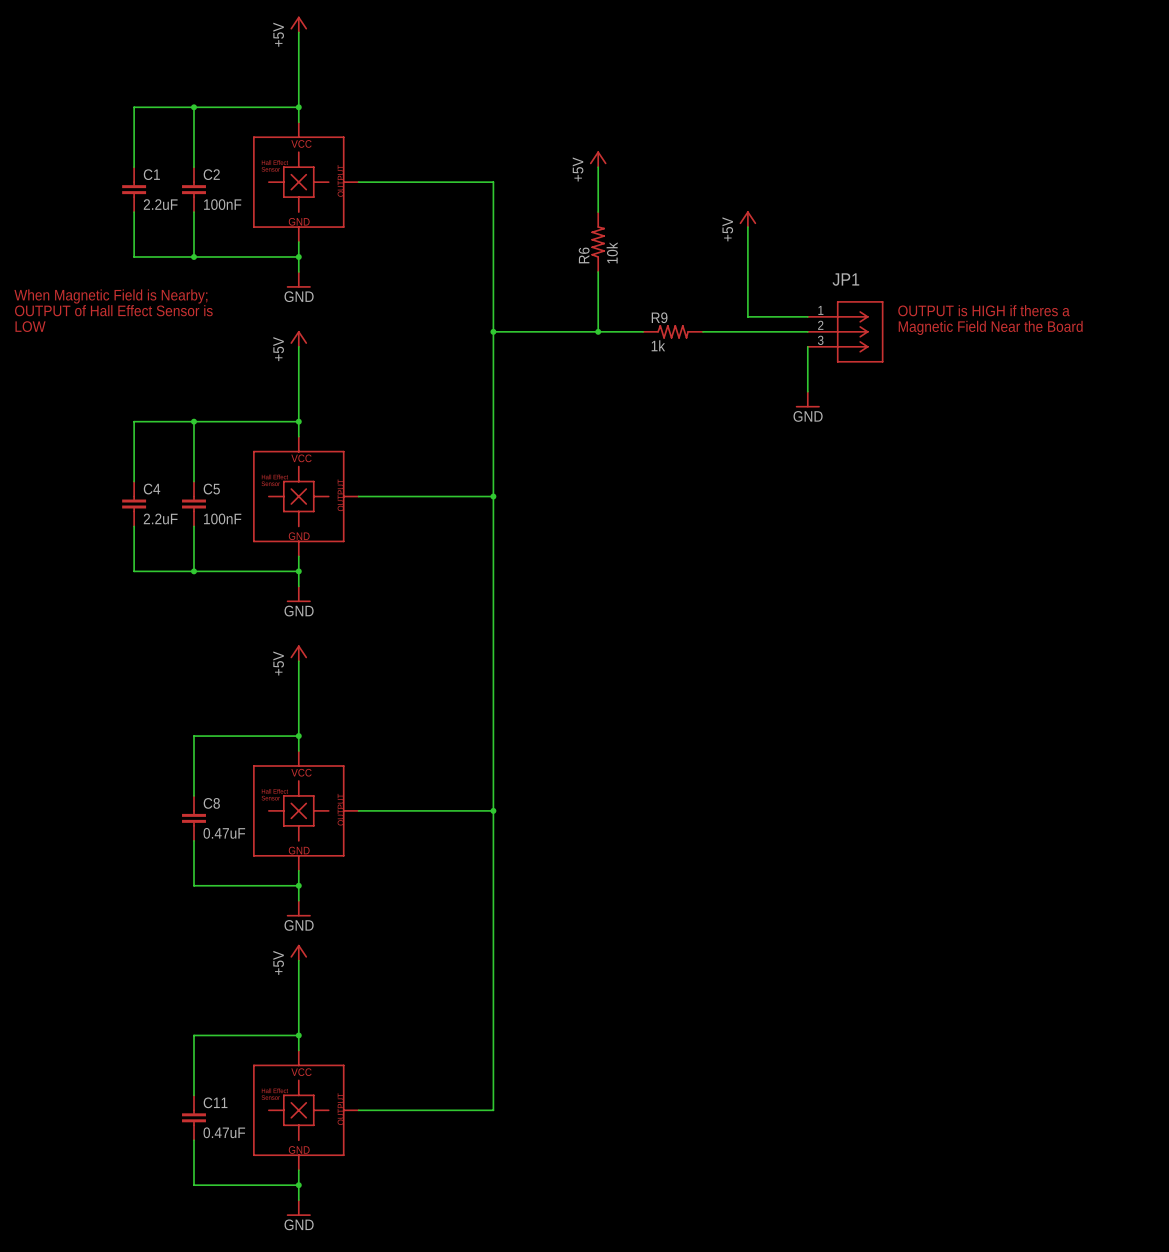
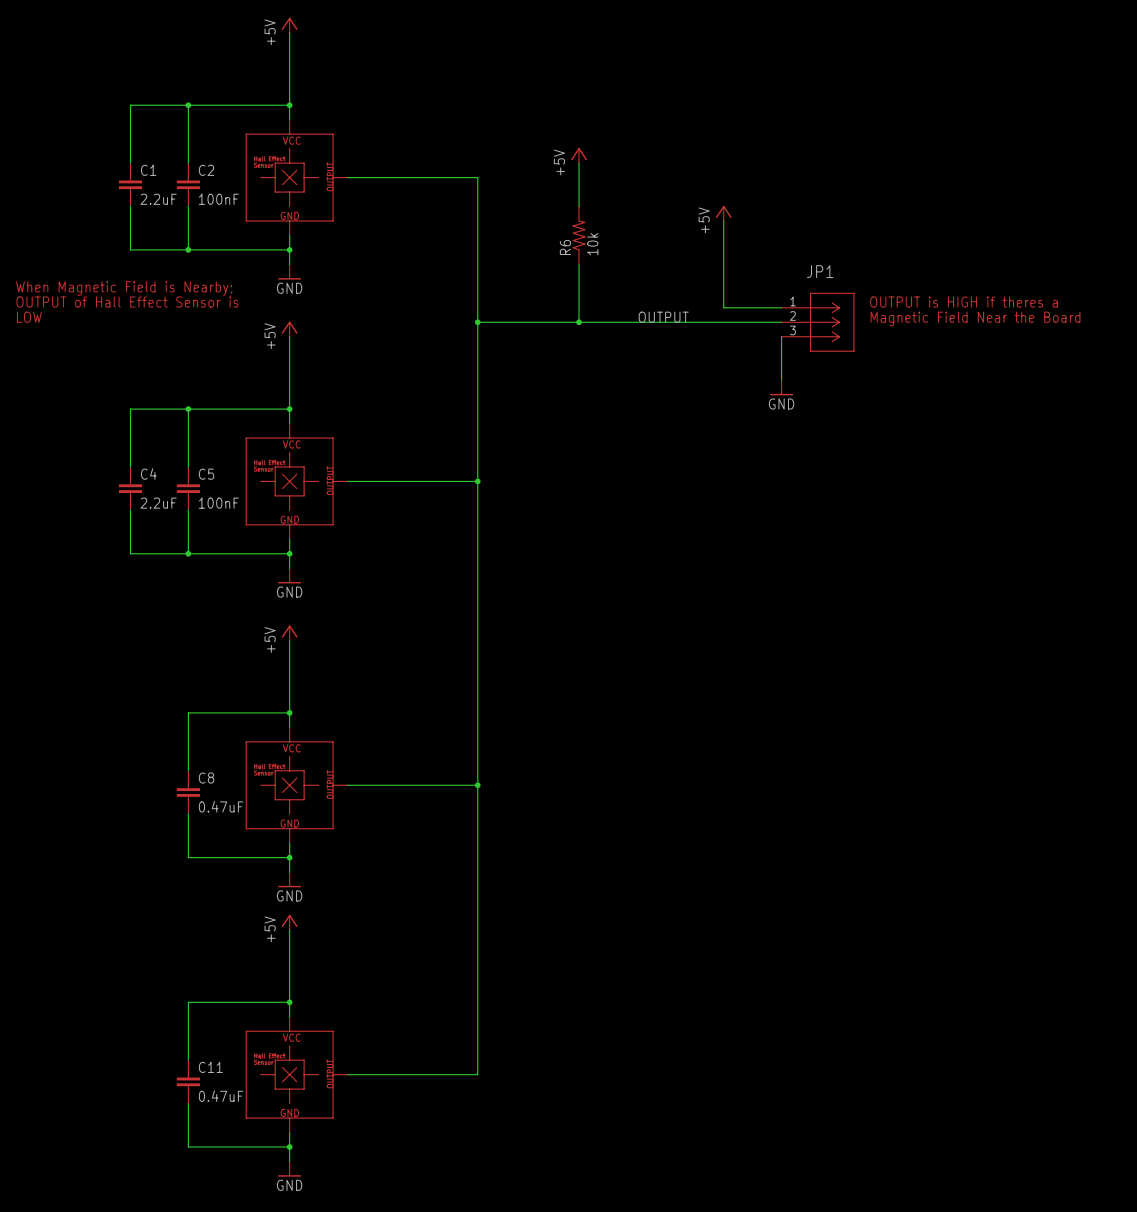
label: none -> OUTPUT (663, 317)
R9: 1k (673, 331) -> none

